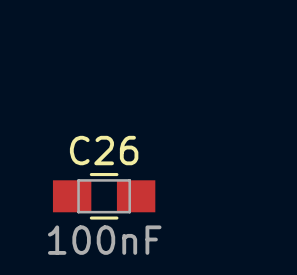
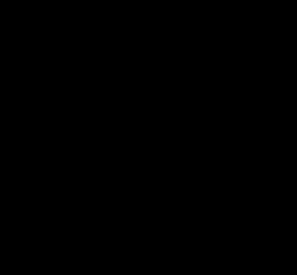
C26: 100nF (104, 196) -> none

